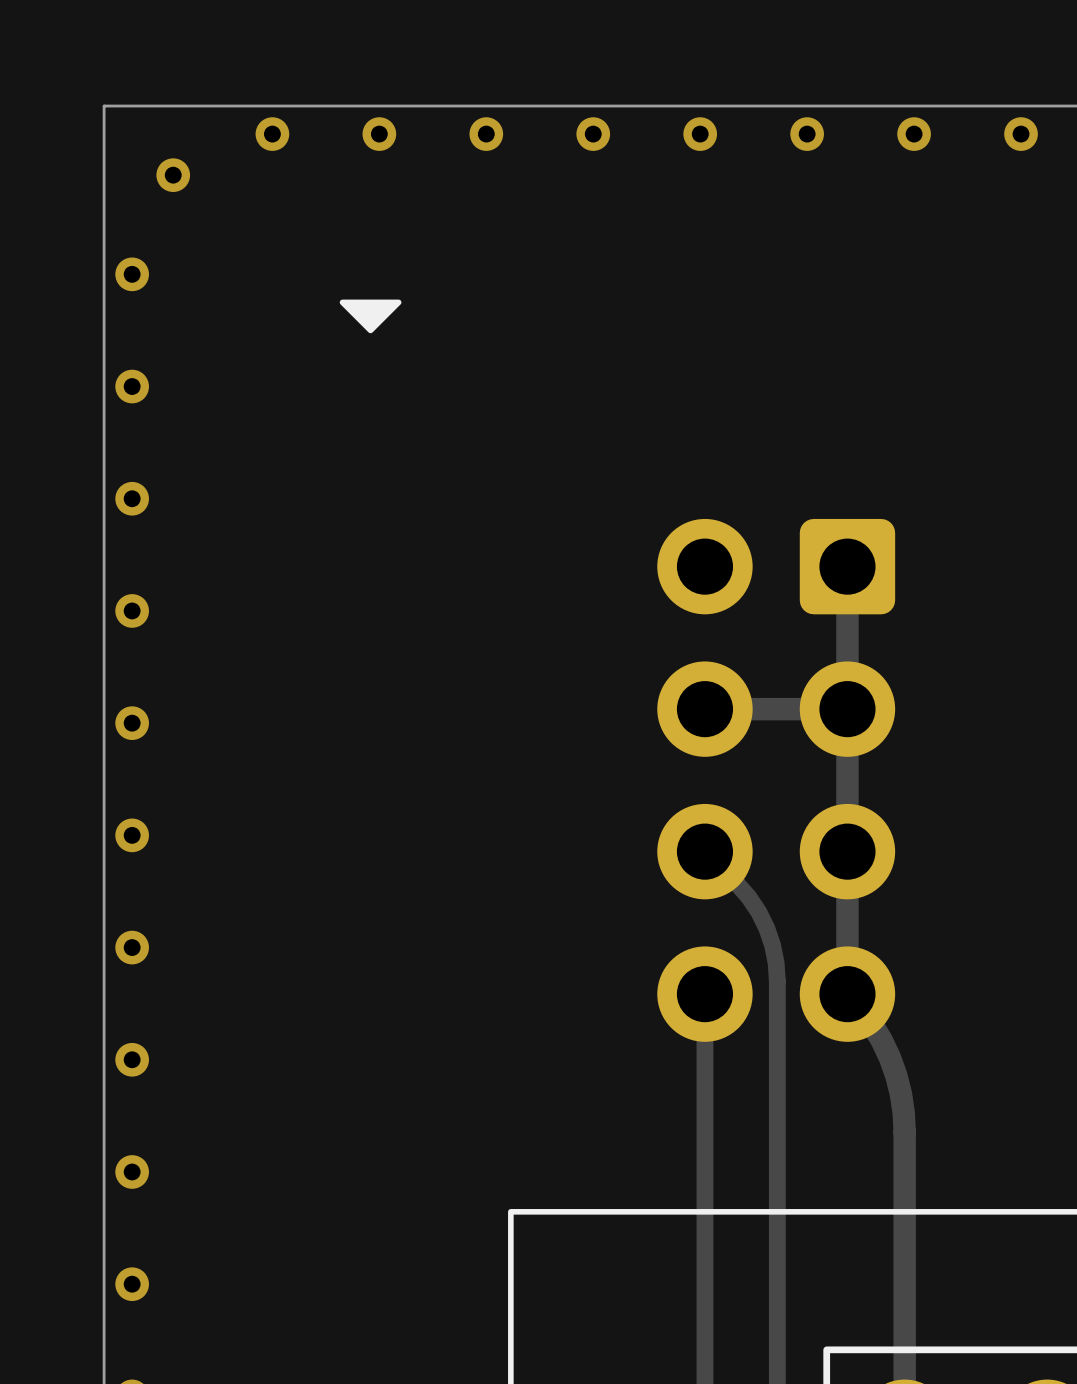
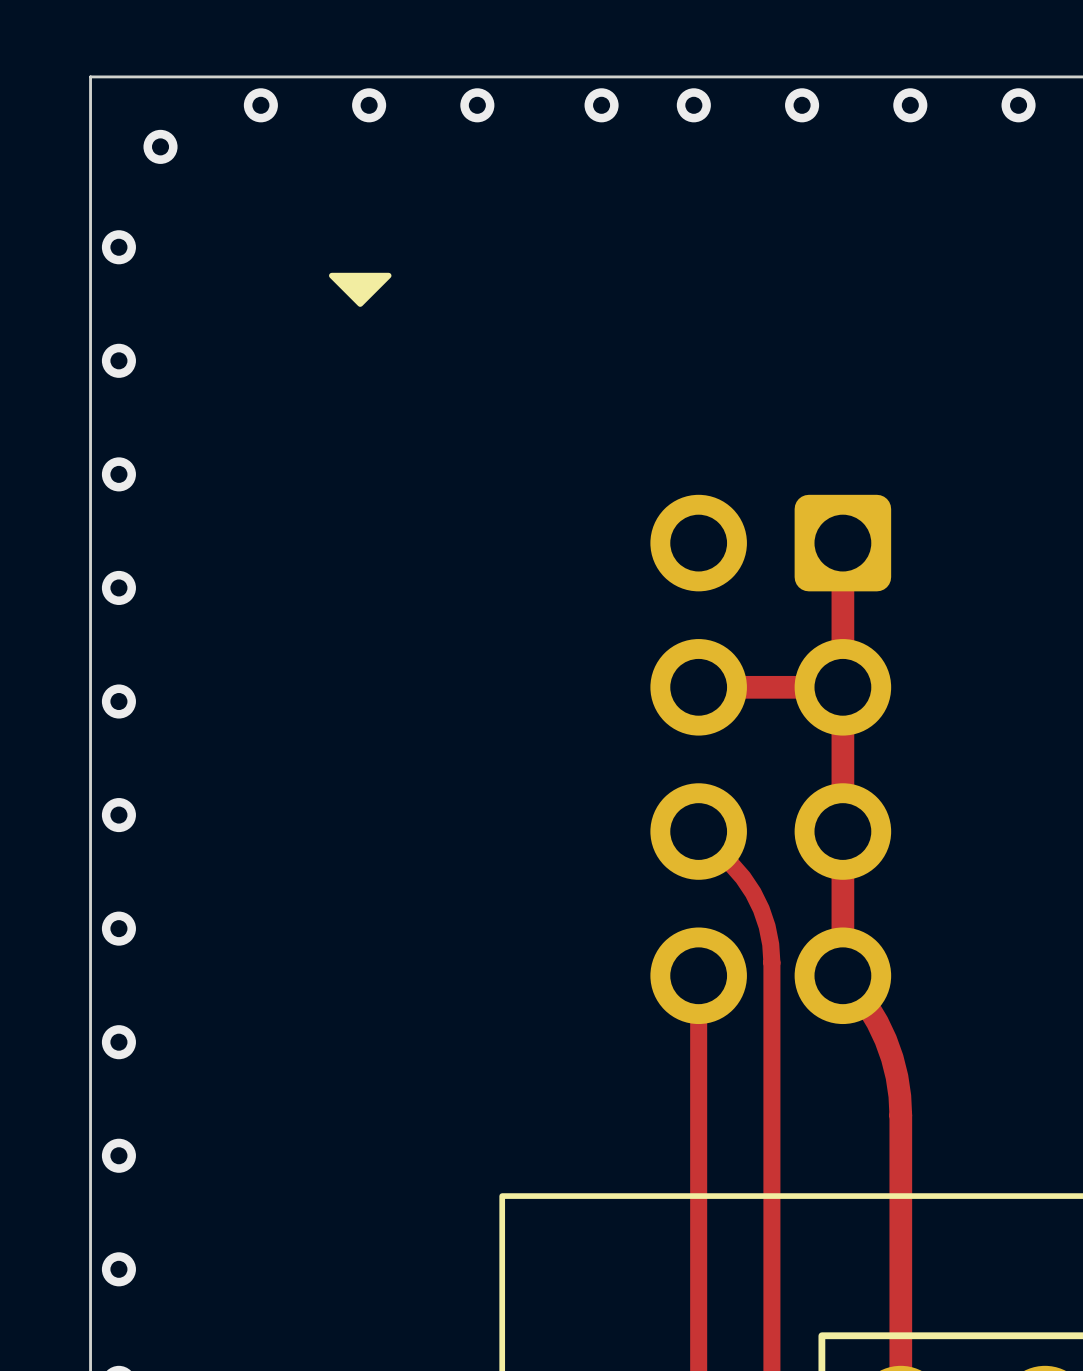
via position: (593, 134) -> (601, 105)

